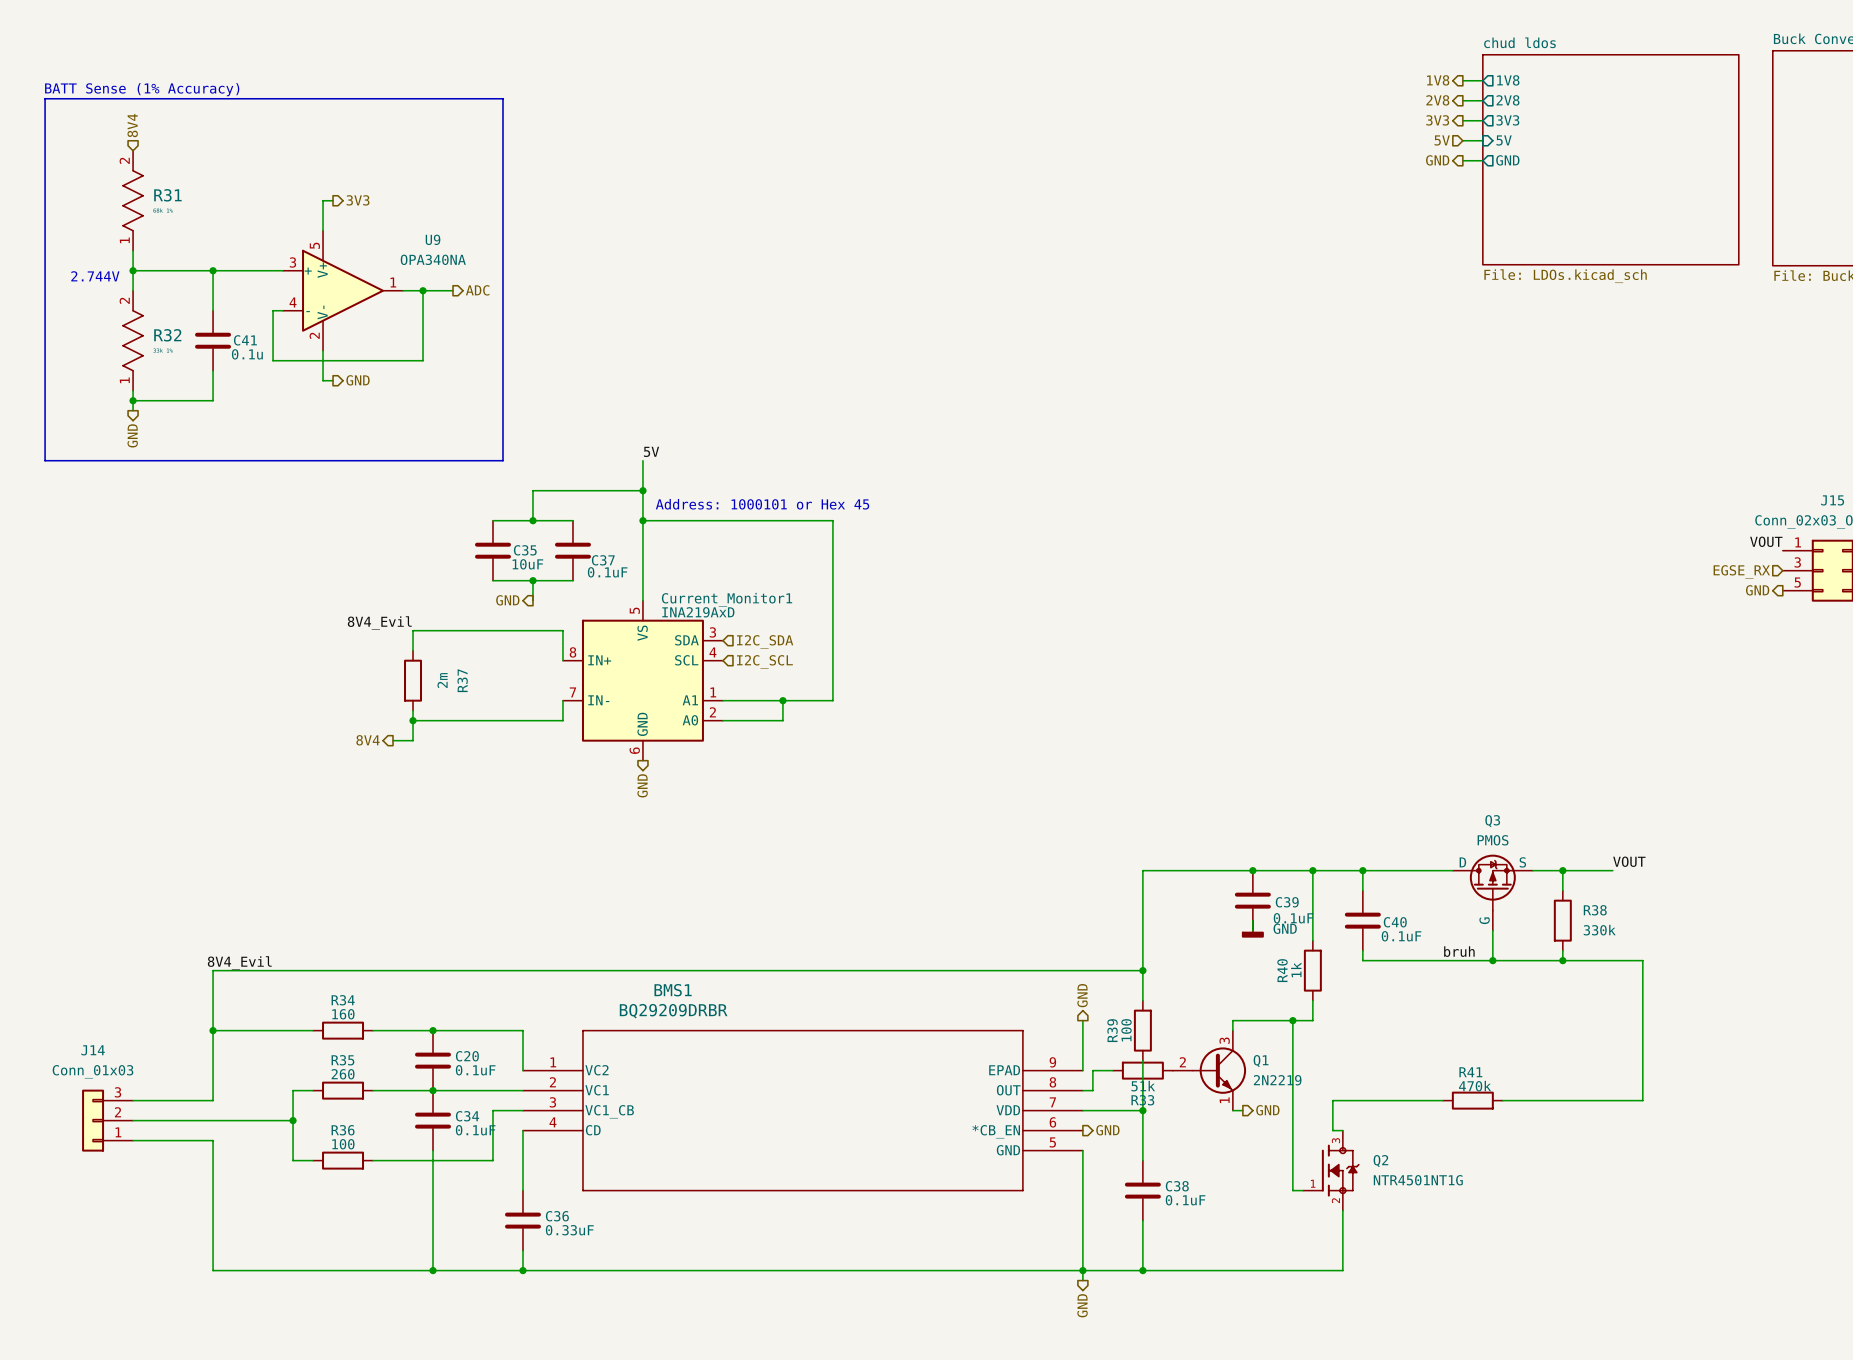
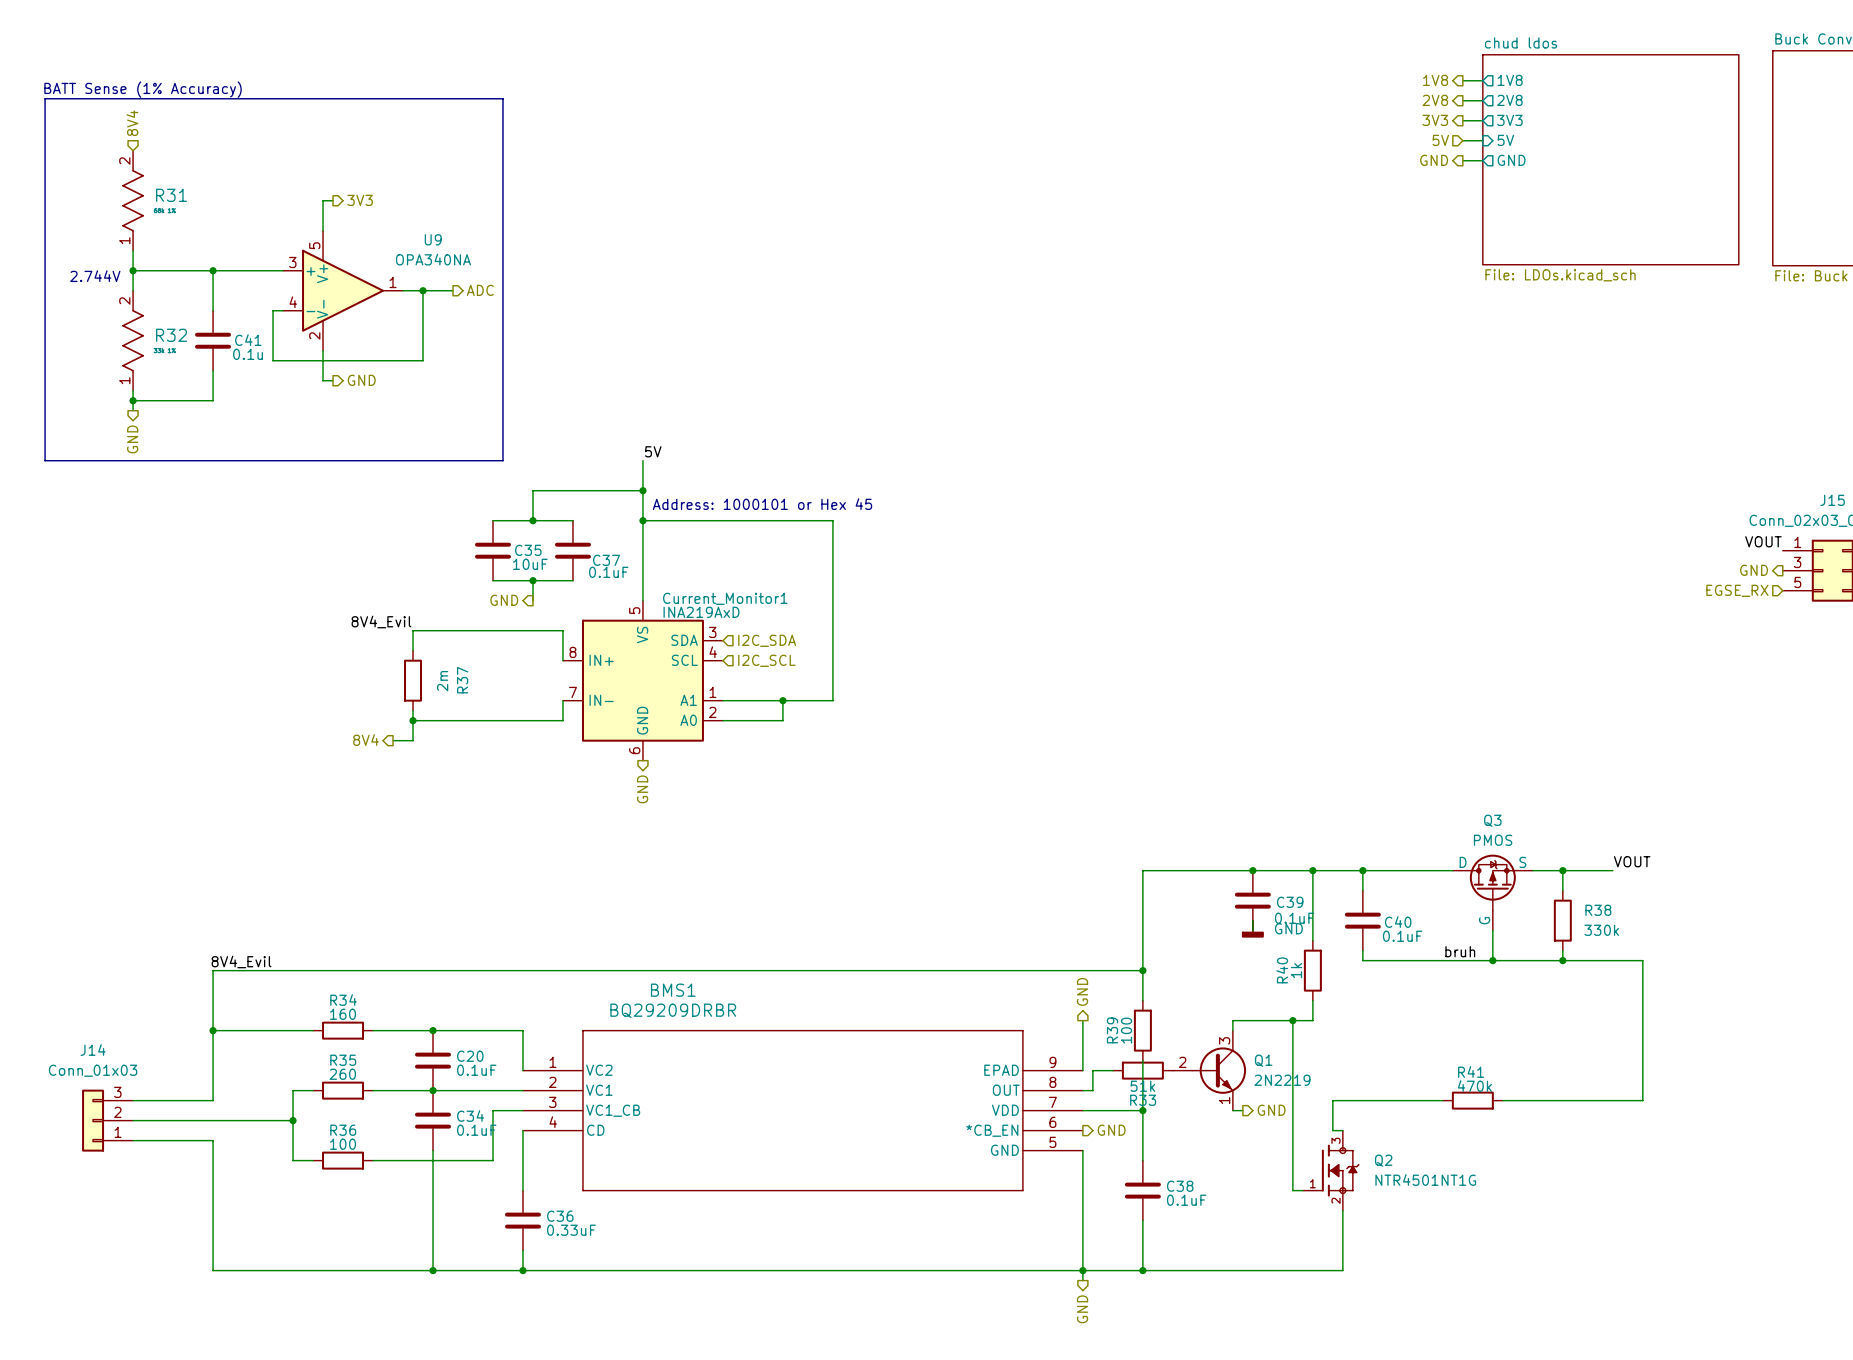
hierarchical label shape: input (1741, 571) -> output (1754, 570)
hierarchical label: EGSE_RX (1741, 571) -> GND (1754, 570)
hierarchical label shape: output (1757, 590) -> input (1737, 590)
hierarchical label: GND (1757, 590) -> EGSE_RX (1737, 590)

